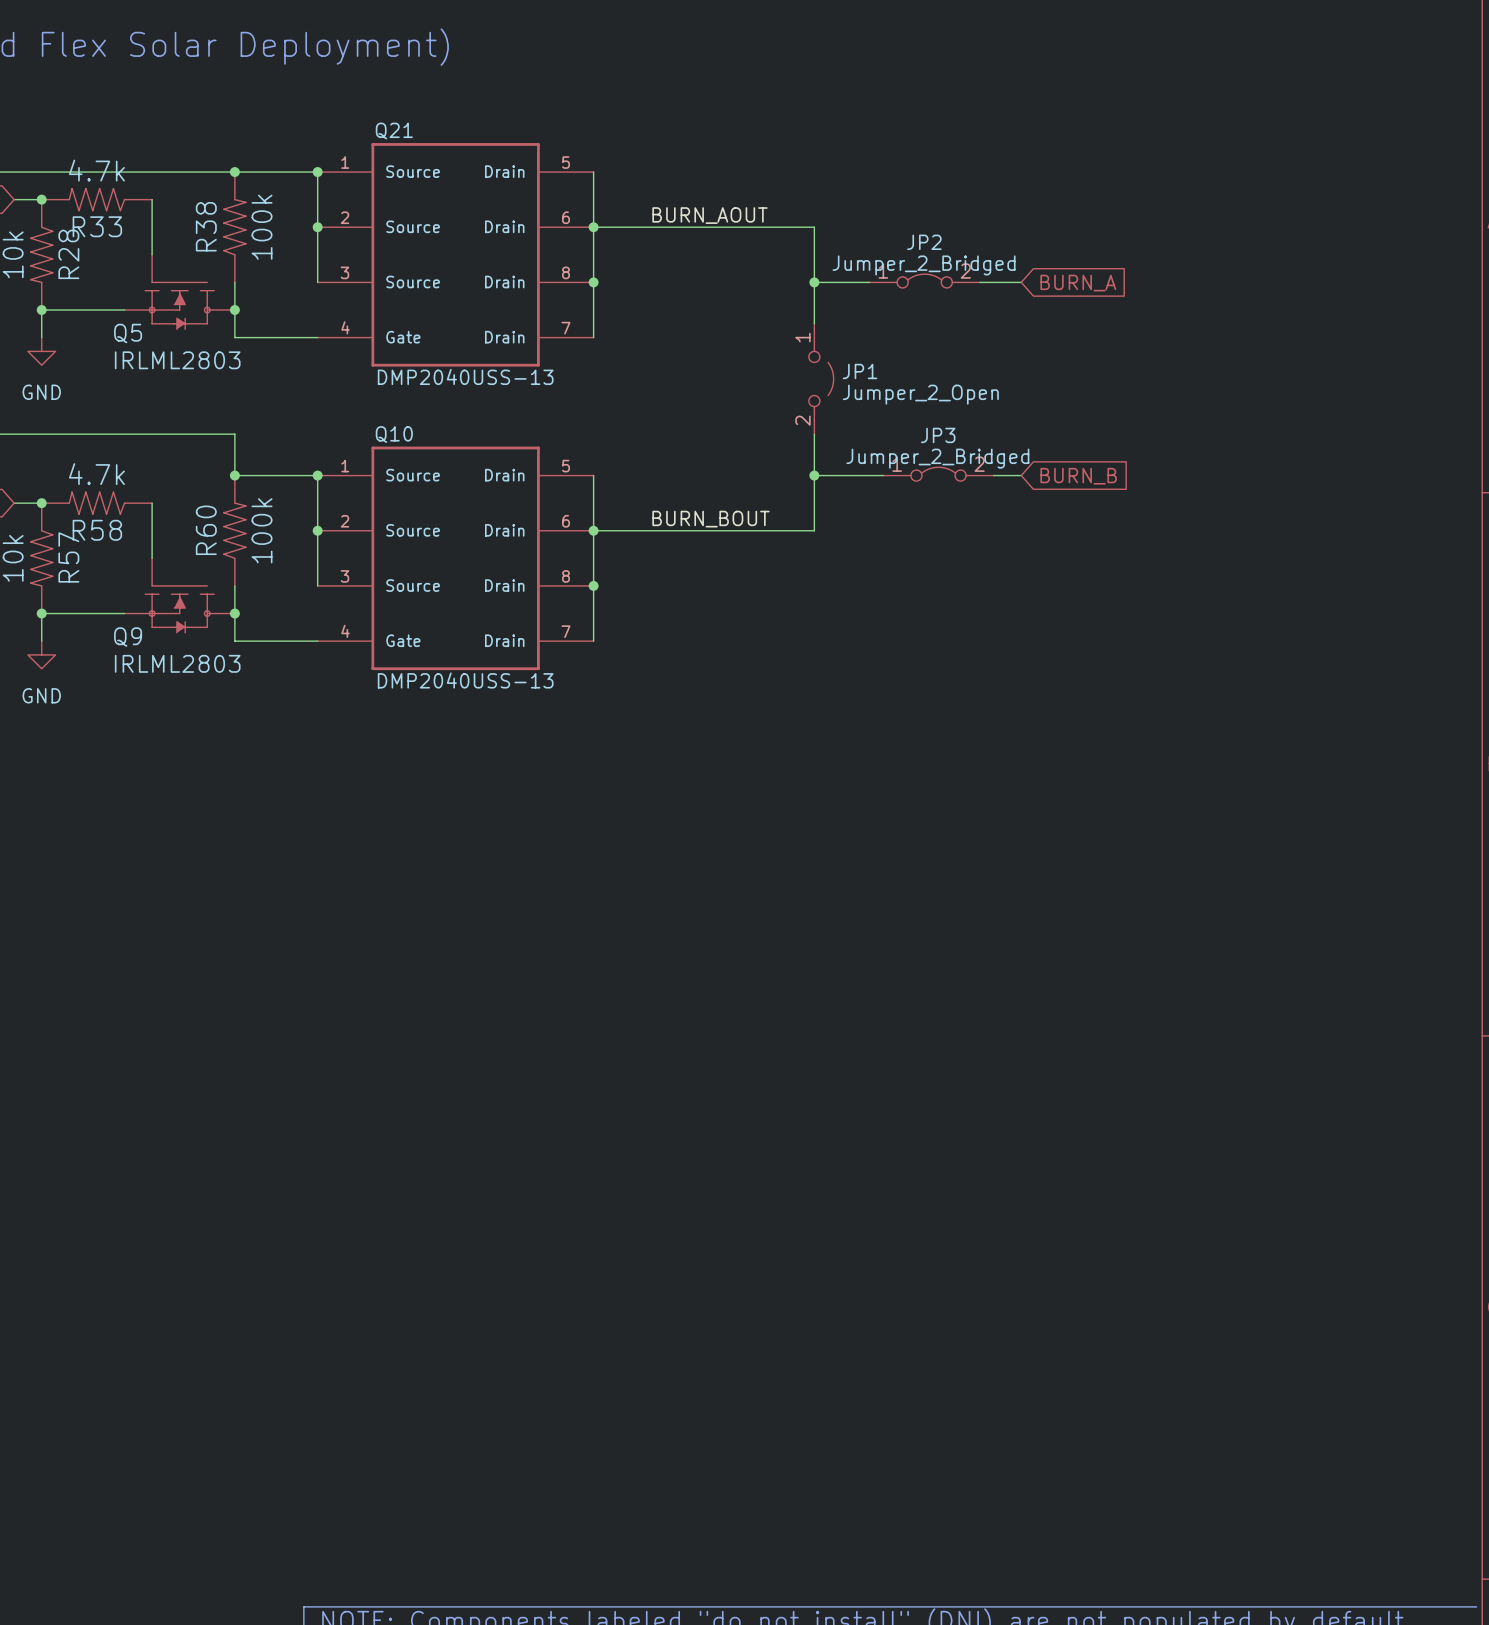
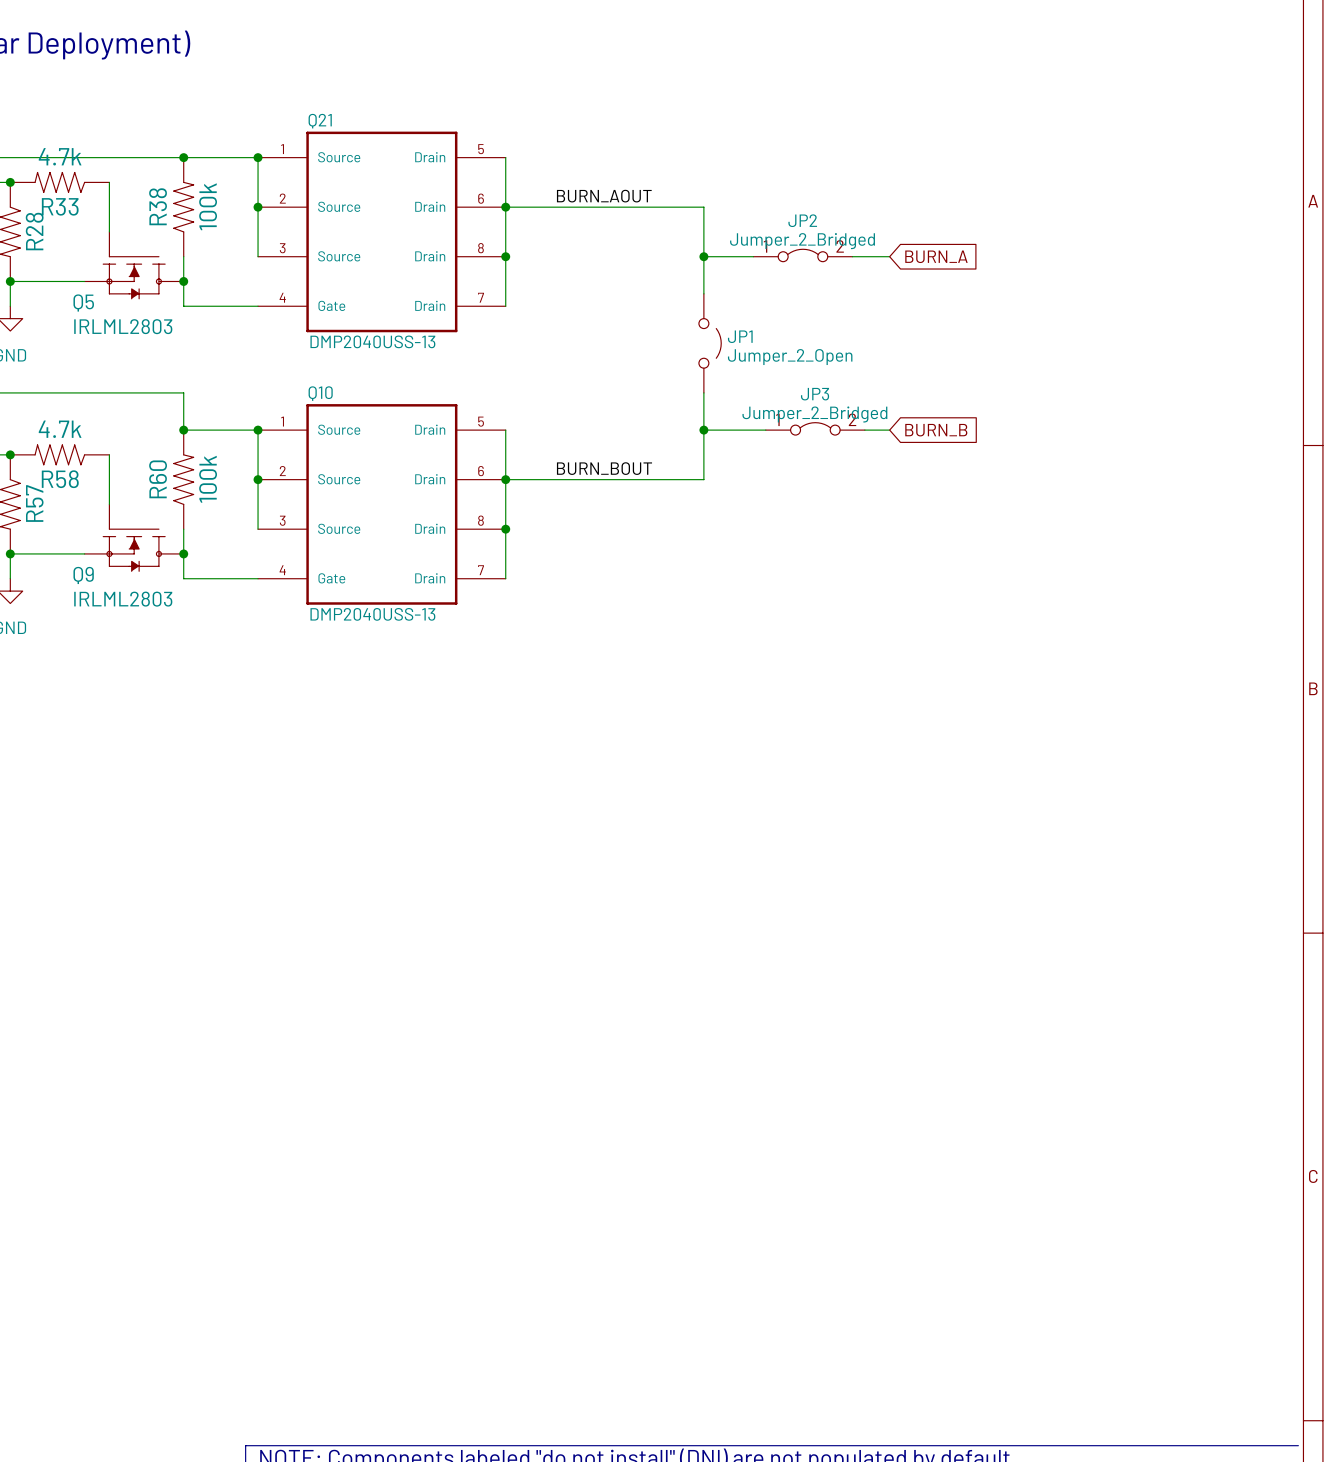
JP1 pin number: 1 (802, 337) -> none
JP1 pin number: 2 (802, 420) -> none

